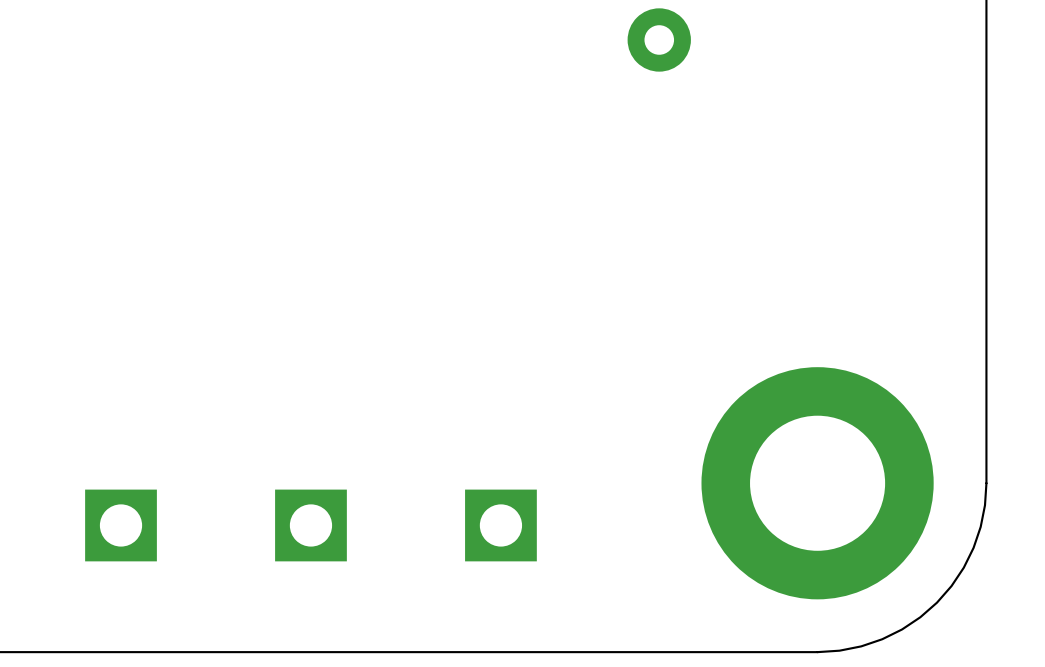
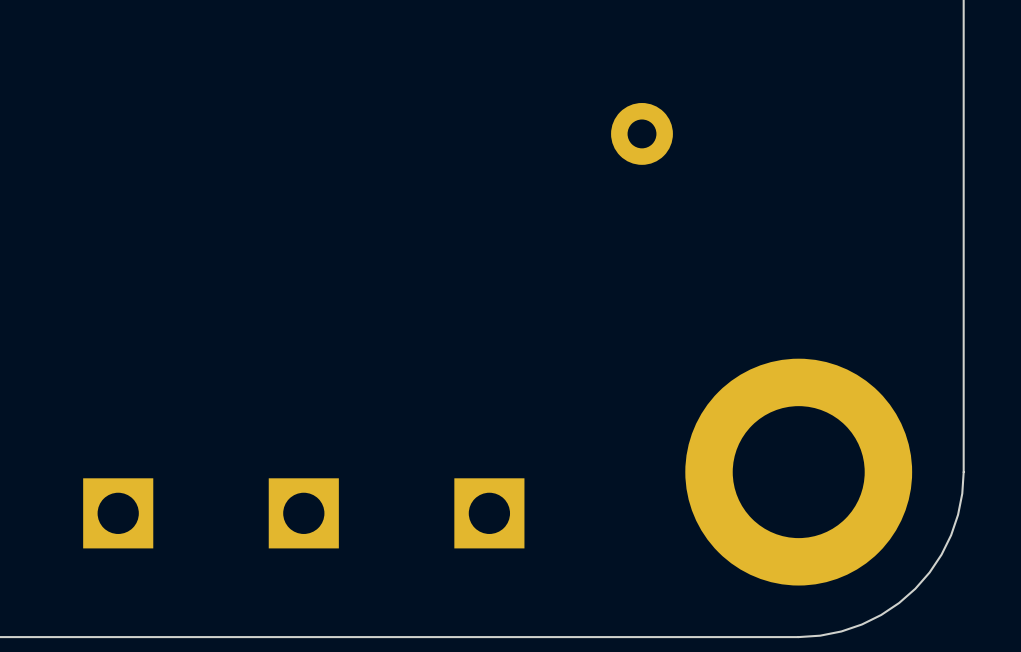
part position: (659, 39) -> (641, 133)

